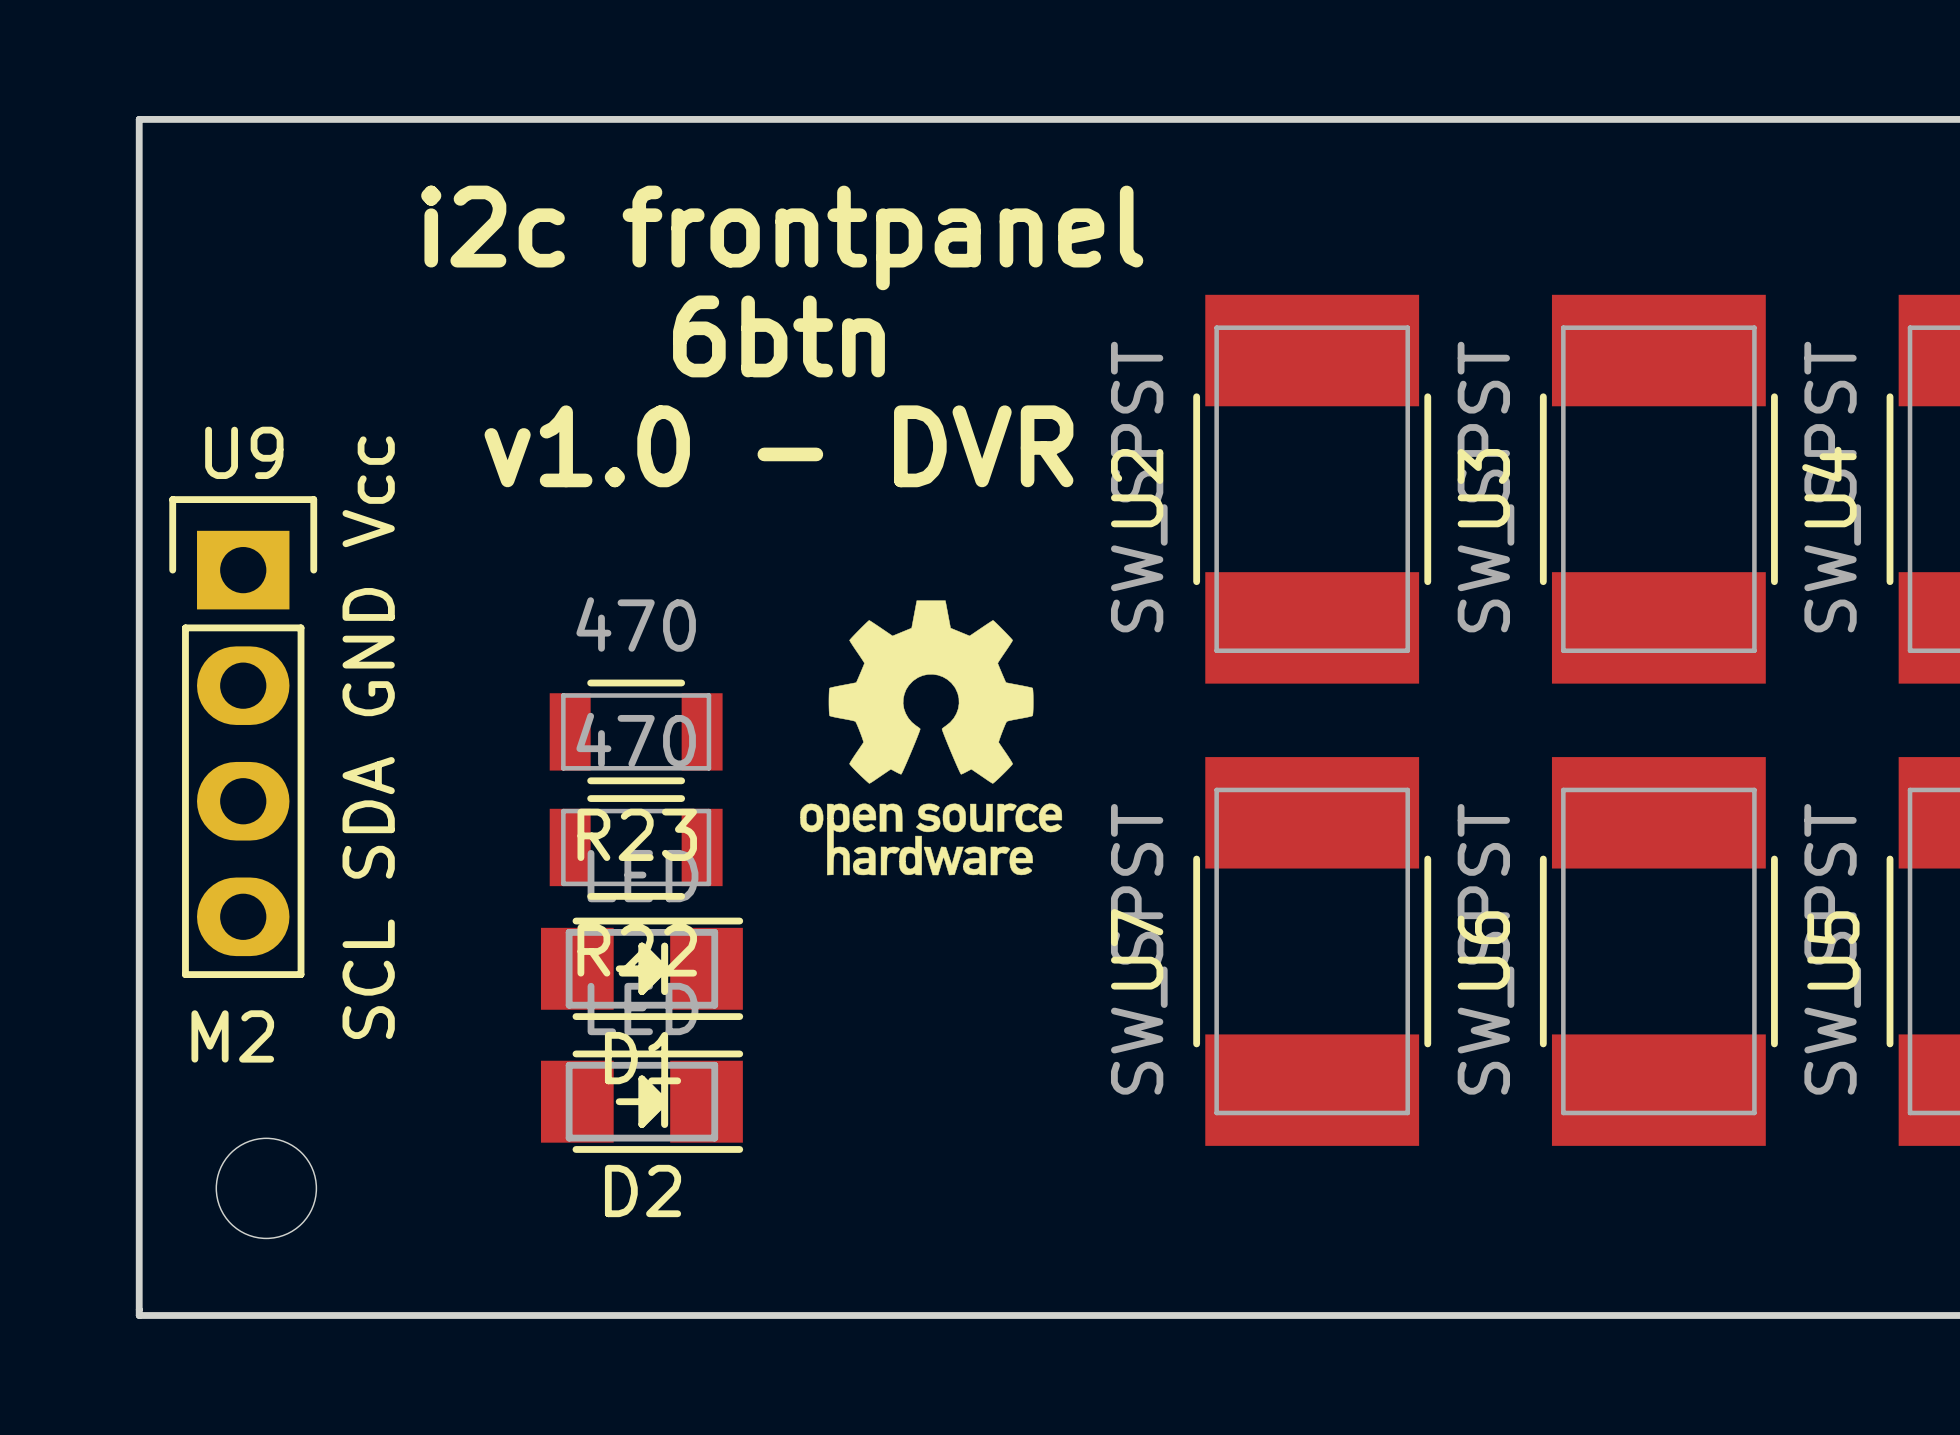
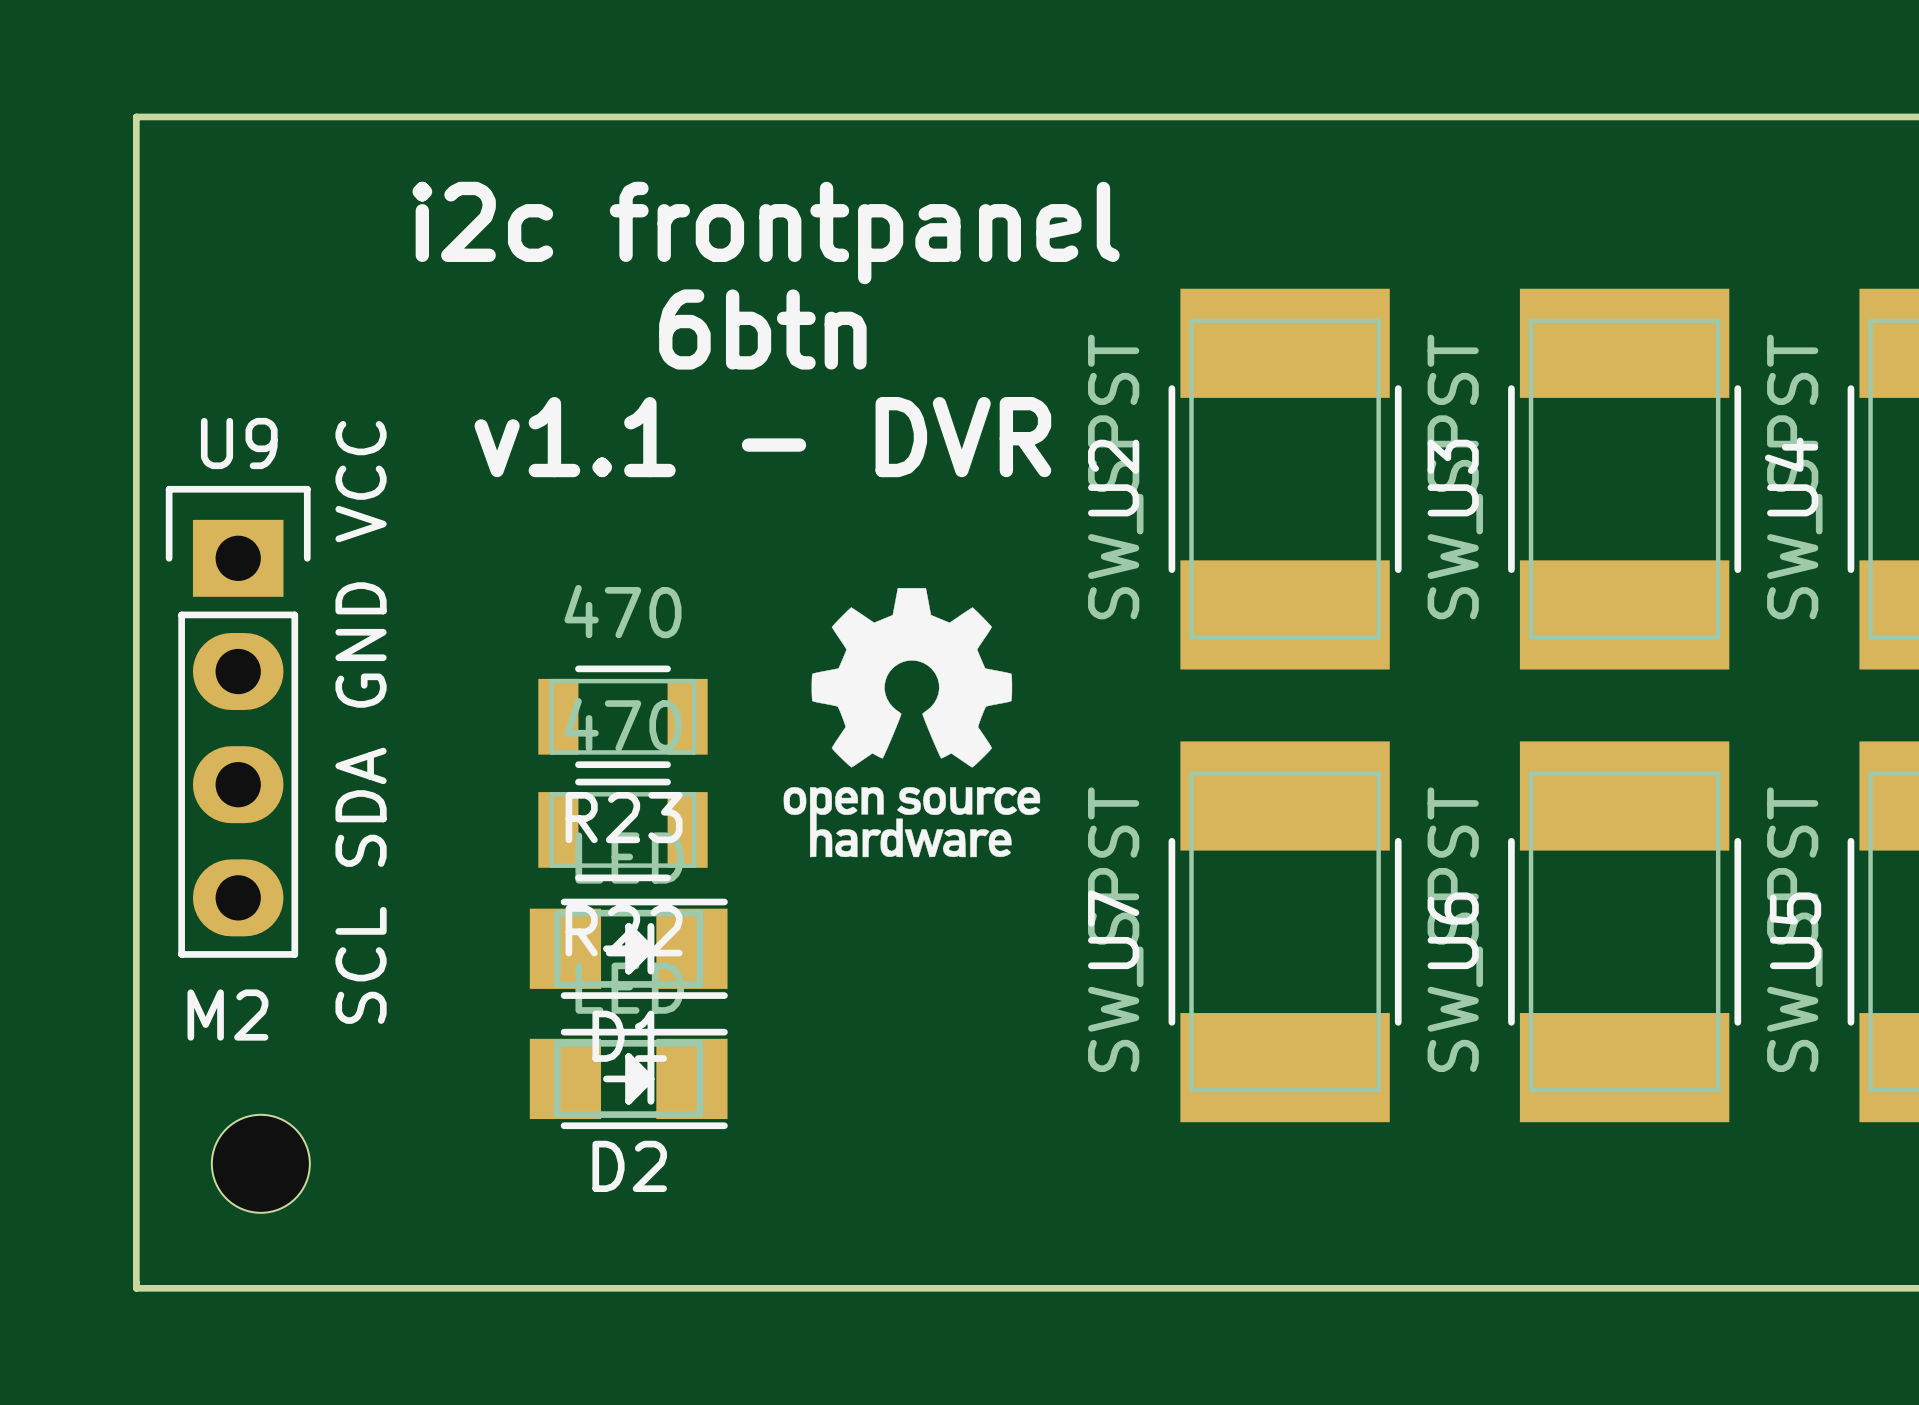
text: v1.0 - DVR (778, 446) -> v1.1 - DVR (762, 437)
U9 value: SCL SDA GND Vcc (368, 737) -> SCL SDA GND VCC (361, 722)

